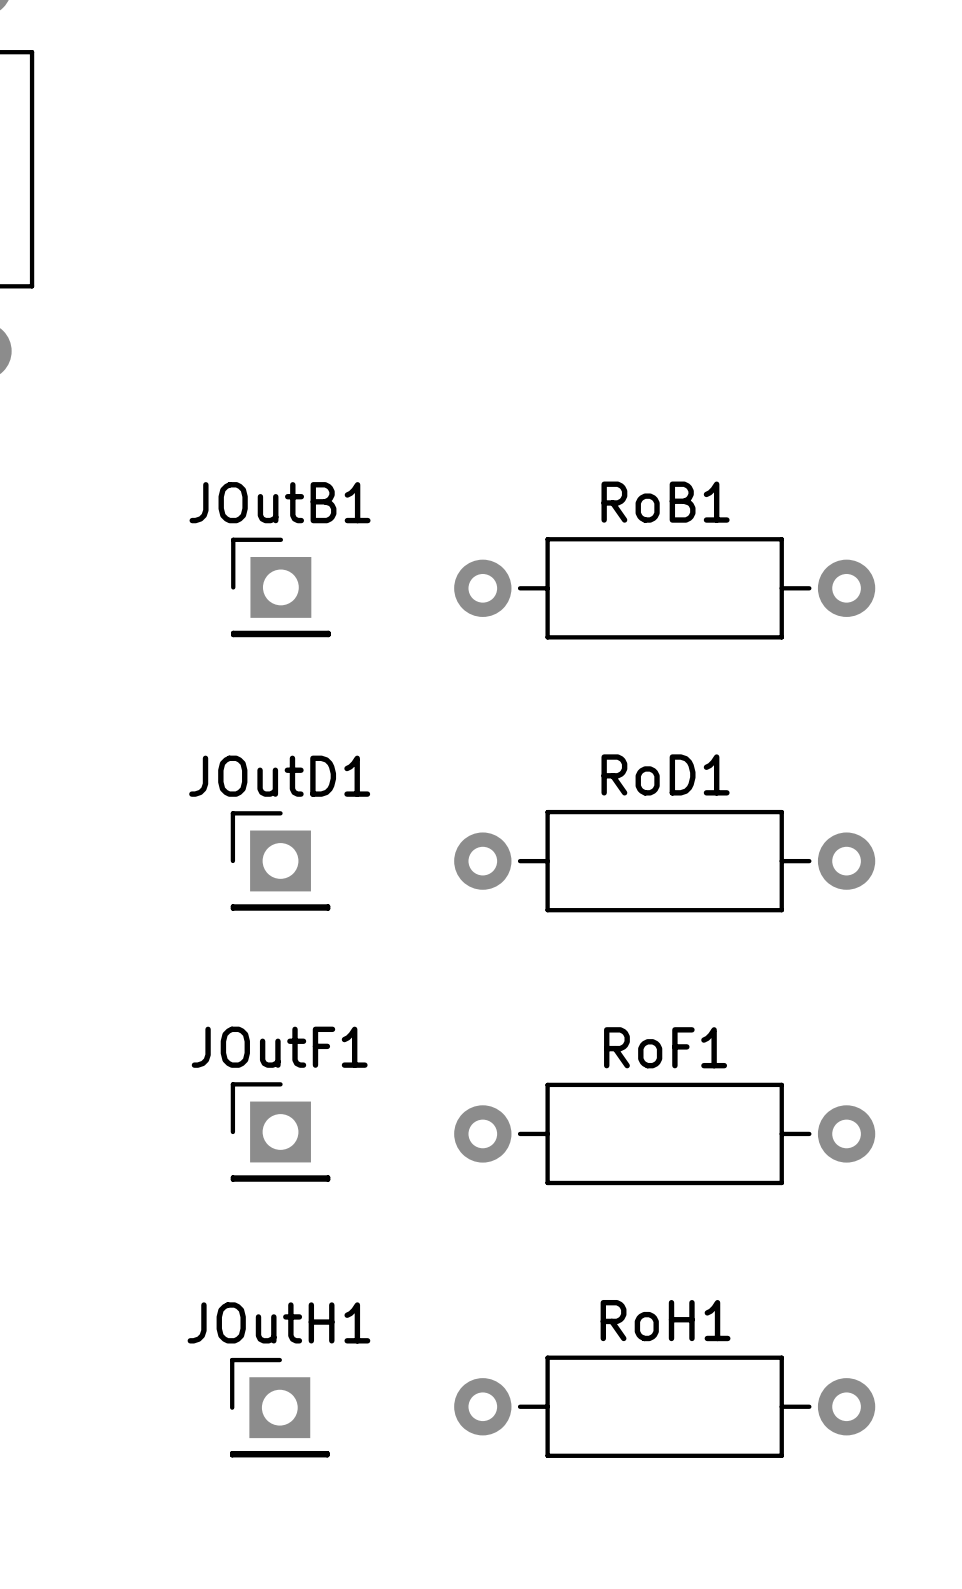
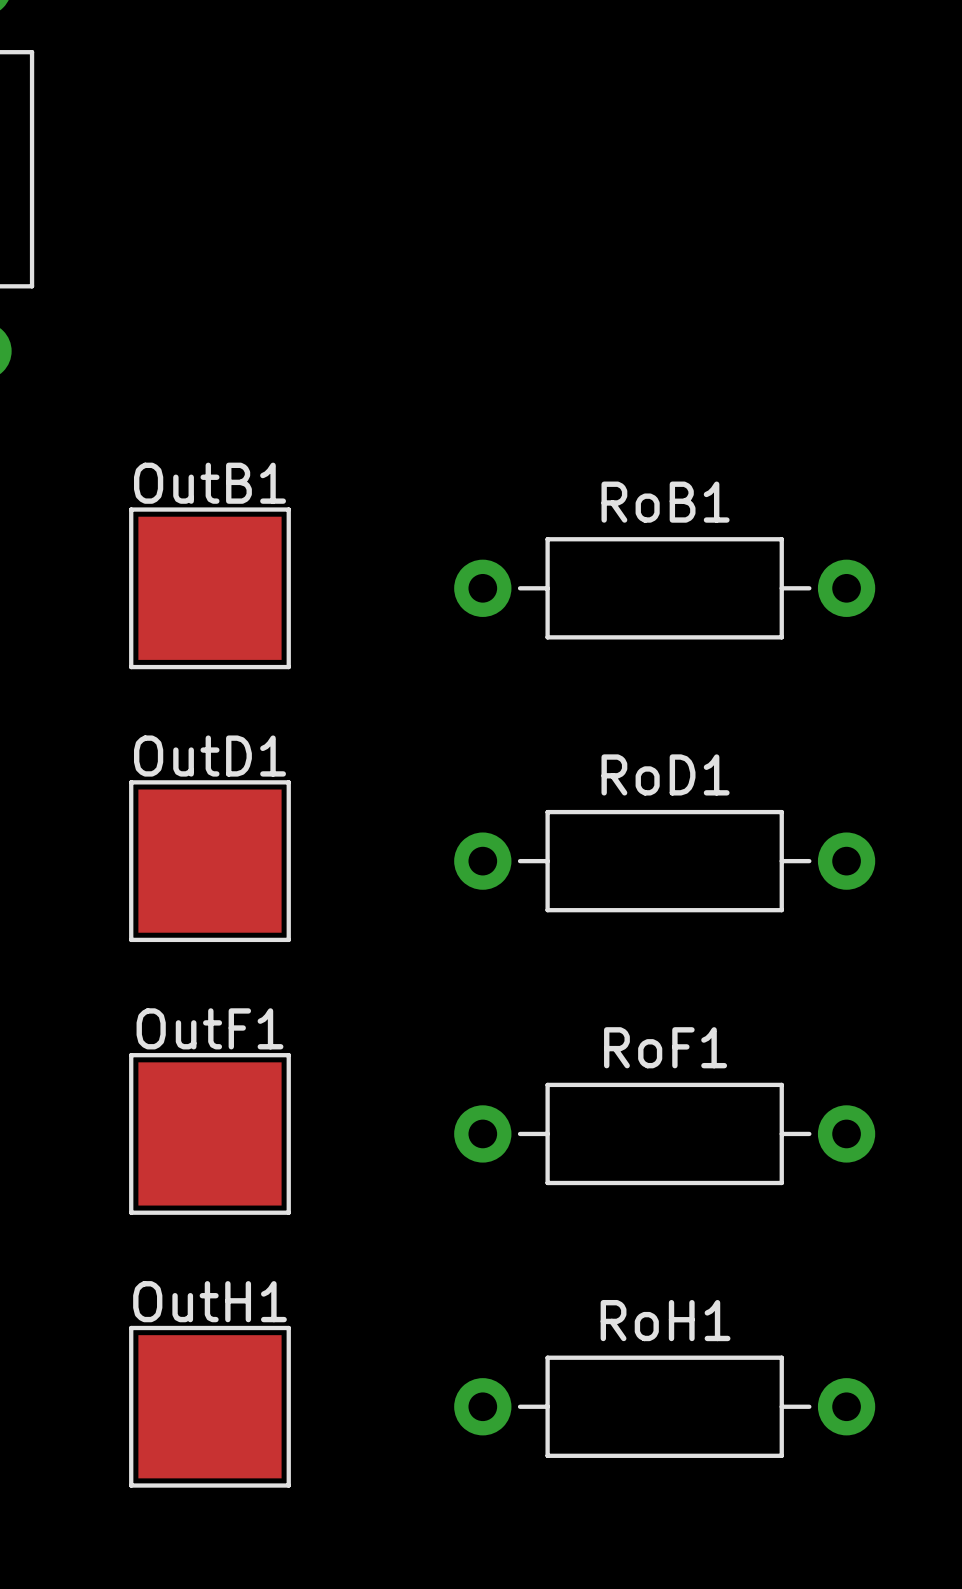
JOutB1: (280, 587) -> none
OutB1: none -> (209, 588)
JOutD1: (280, 860) -> none
OutD1: none -> (209, 861)
JOutF1: (280, 1131) -> none
OutF1: none -> (209, 1133)
OutH1: none -> (209, 1406)
JOutH1: (279, 1407) -> none

